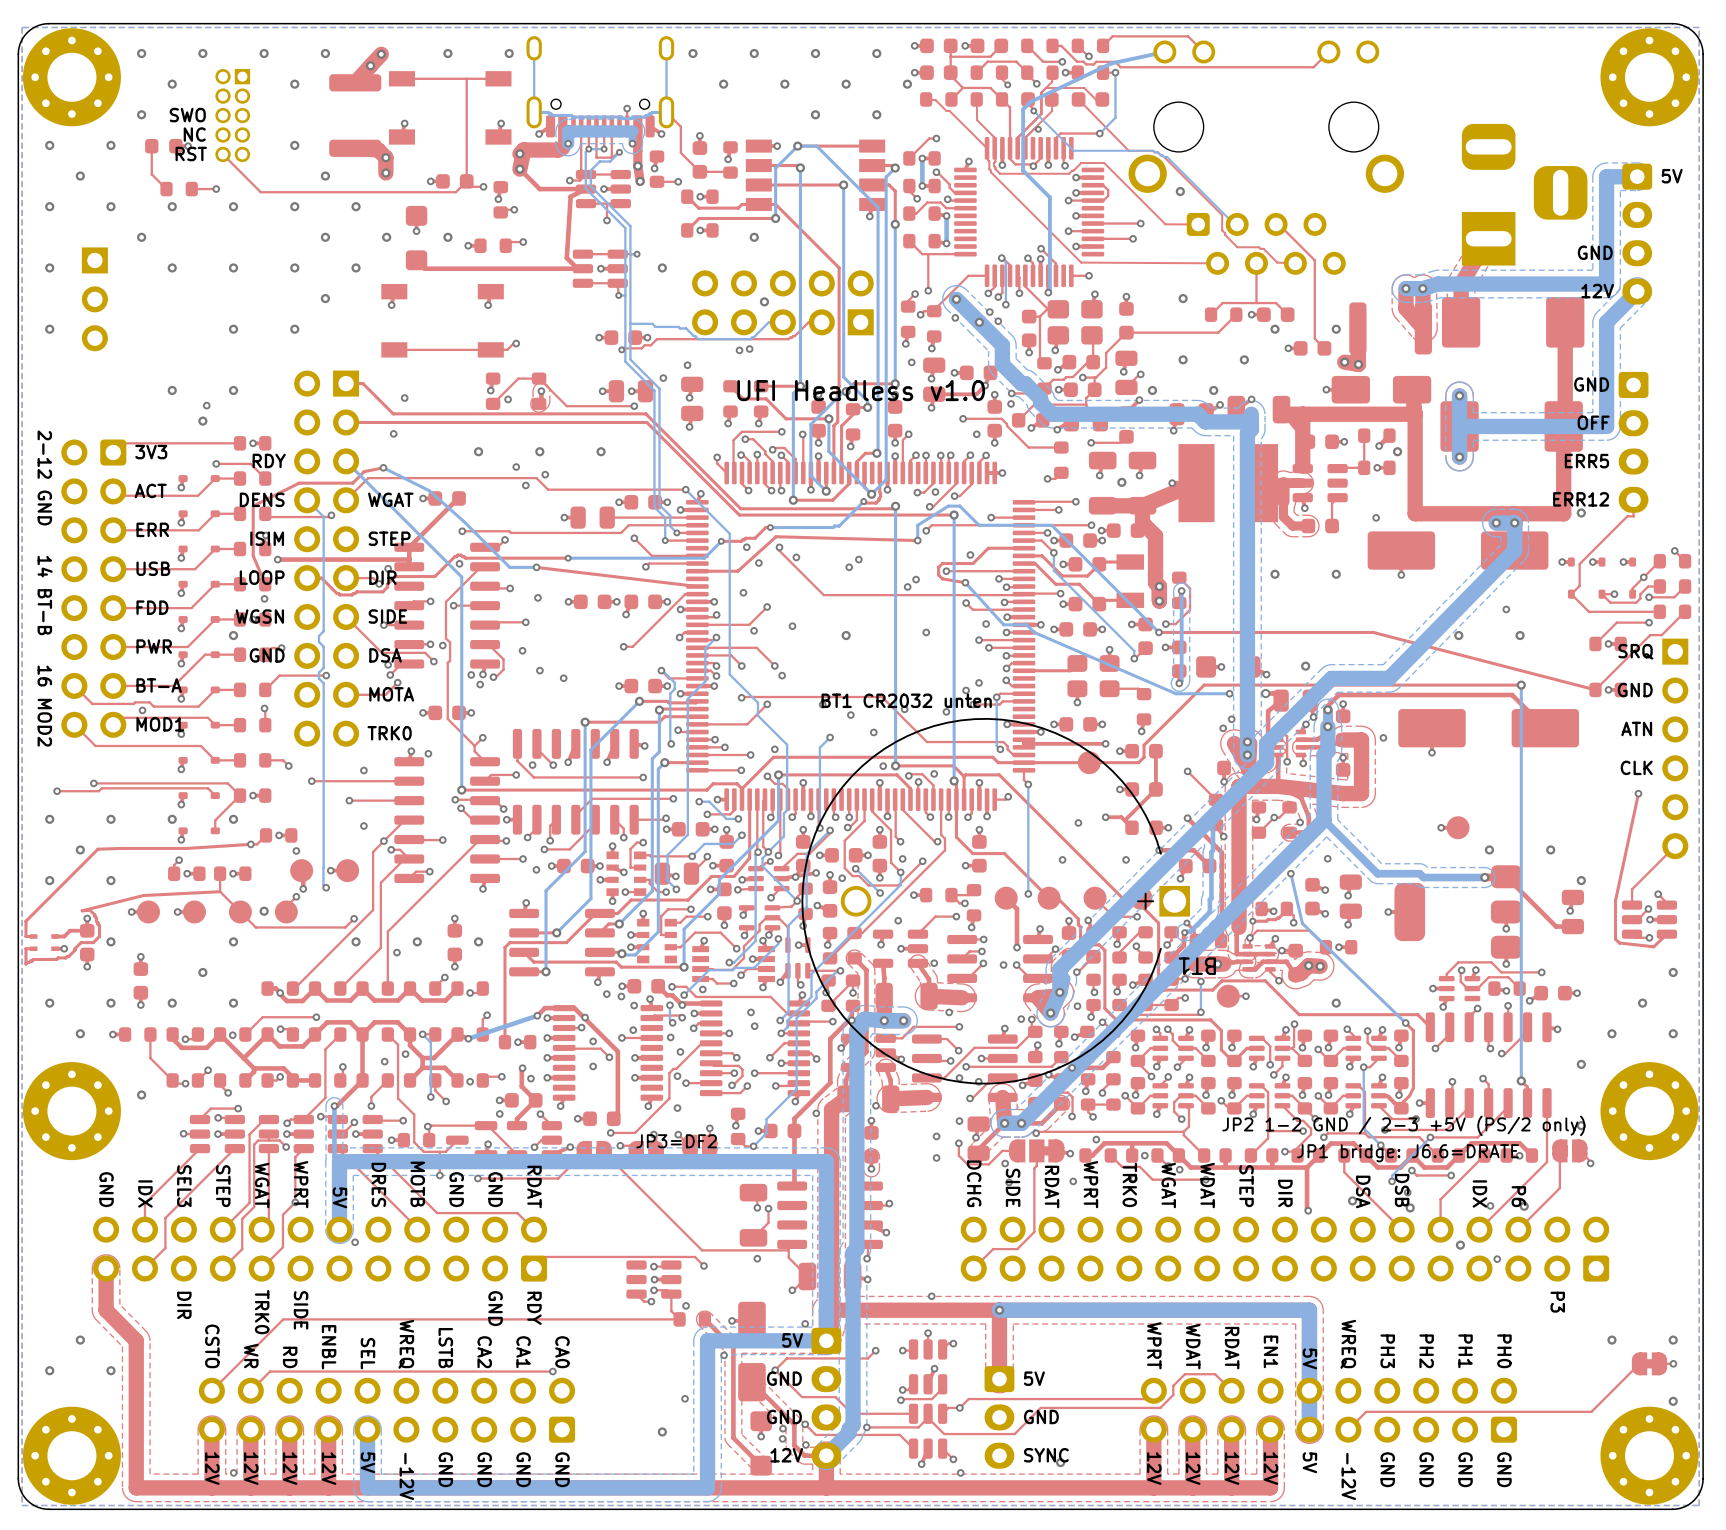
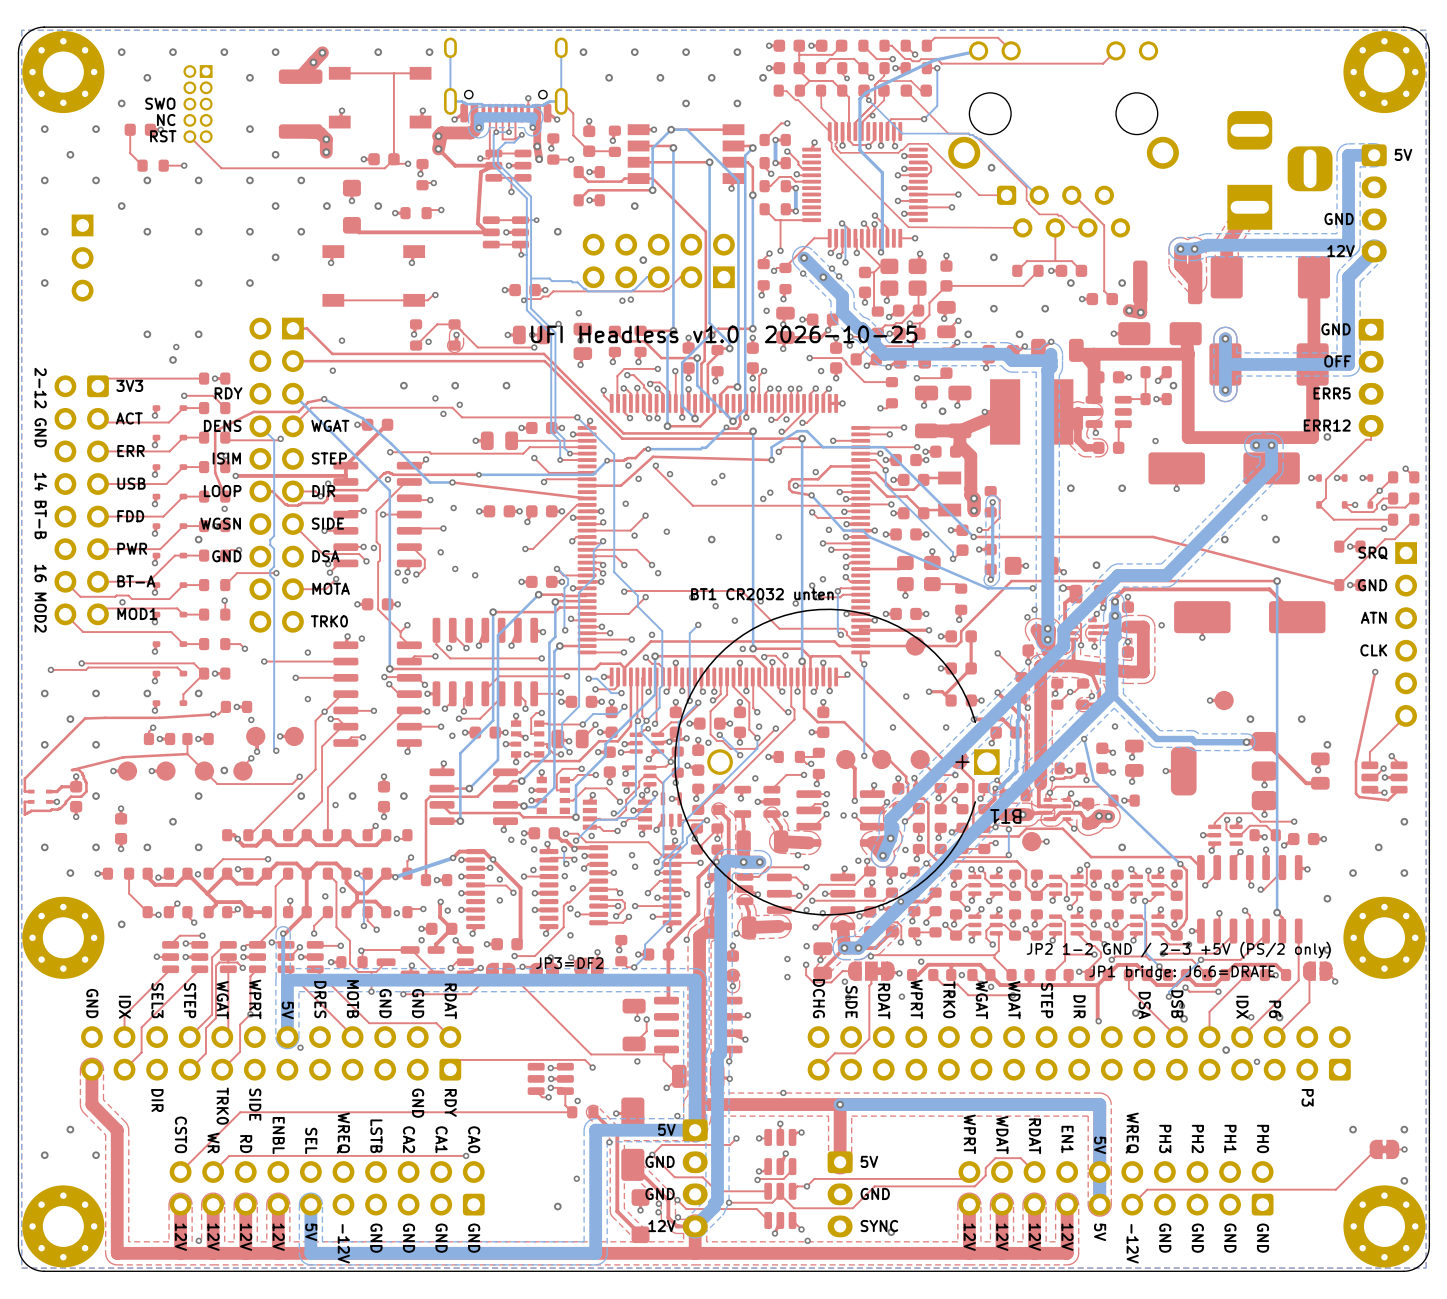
text: UFI Headless v1.0 (861, 390) -> UFI Headless v1.0 2026-10-25 (724, 334)

